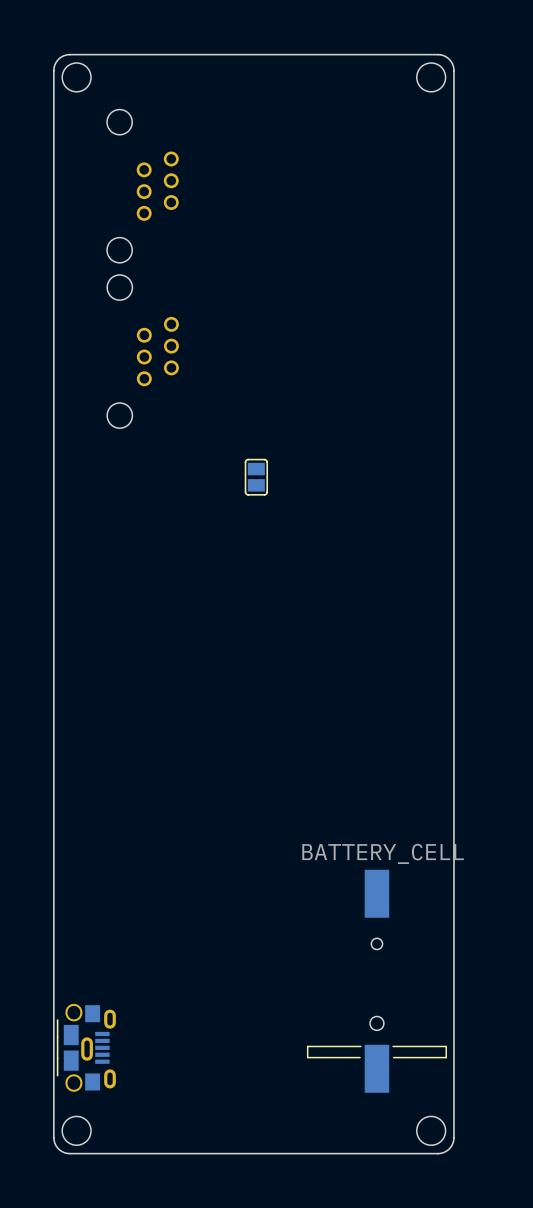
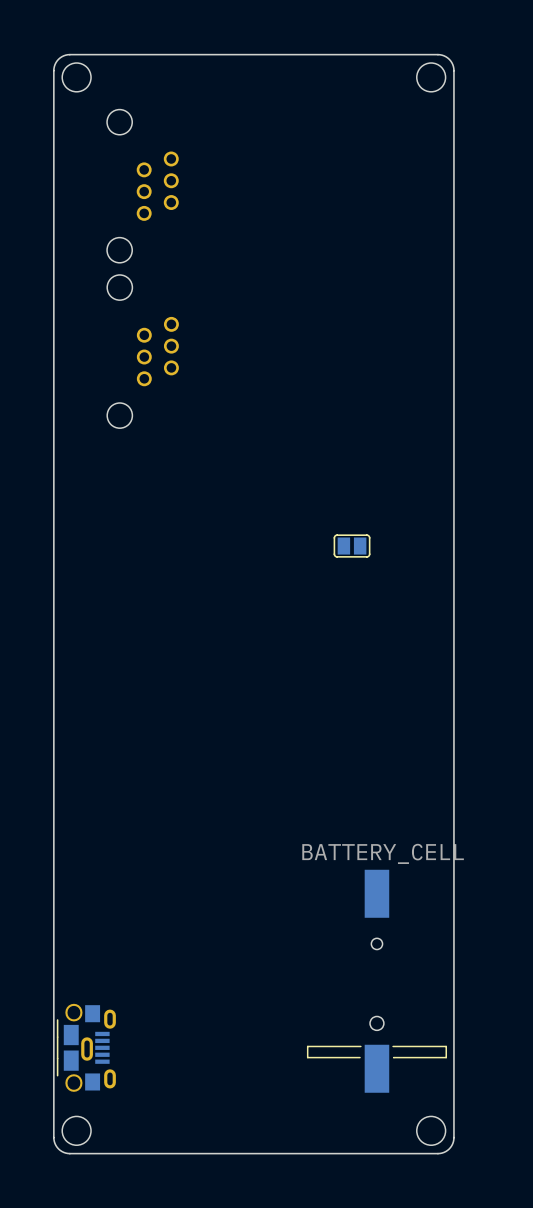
part rotation: 0° (256, 477) -> 90° clockwise (352, 546)
part position: (256, 477) -> (352, 546)

